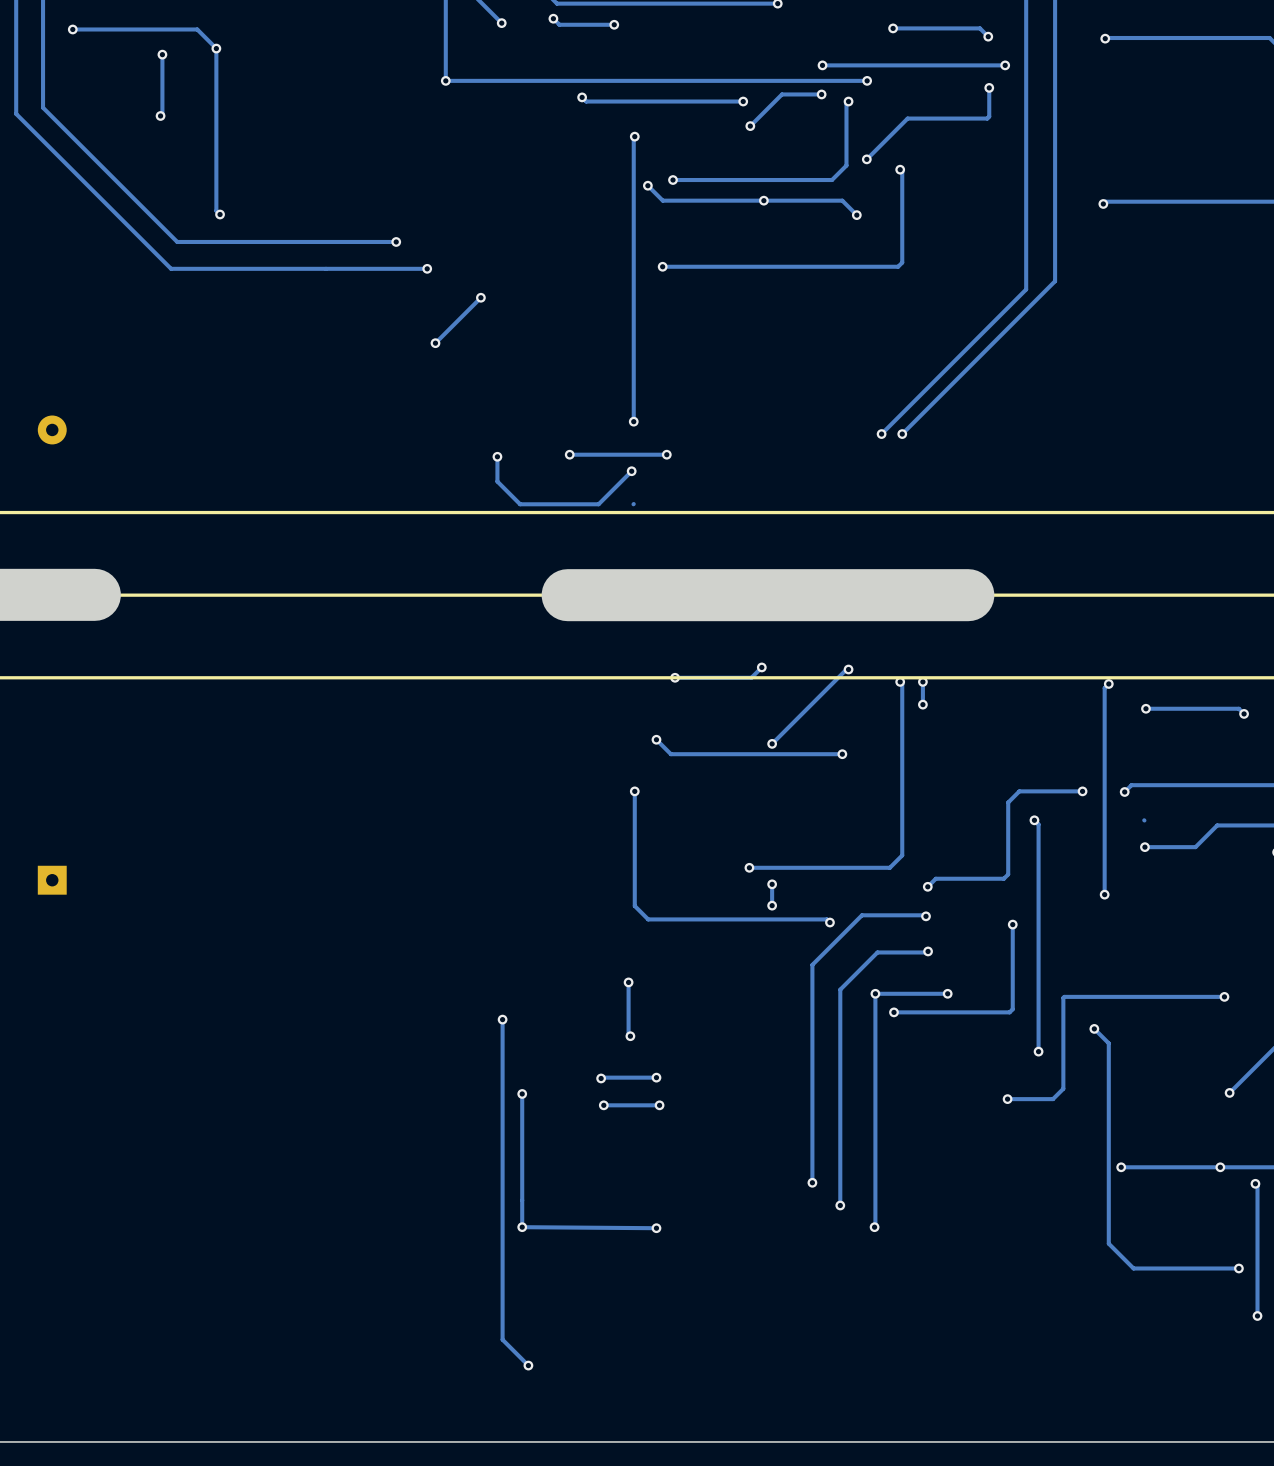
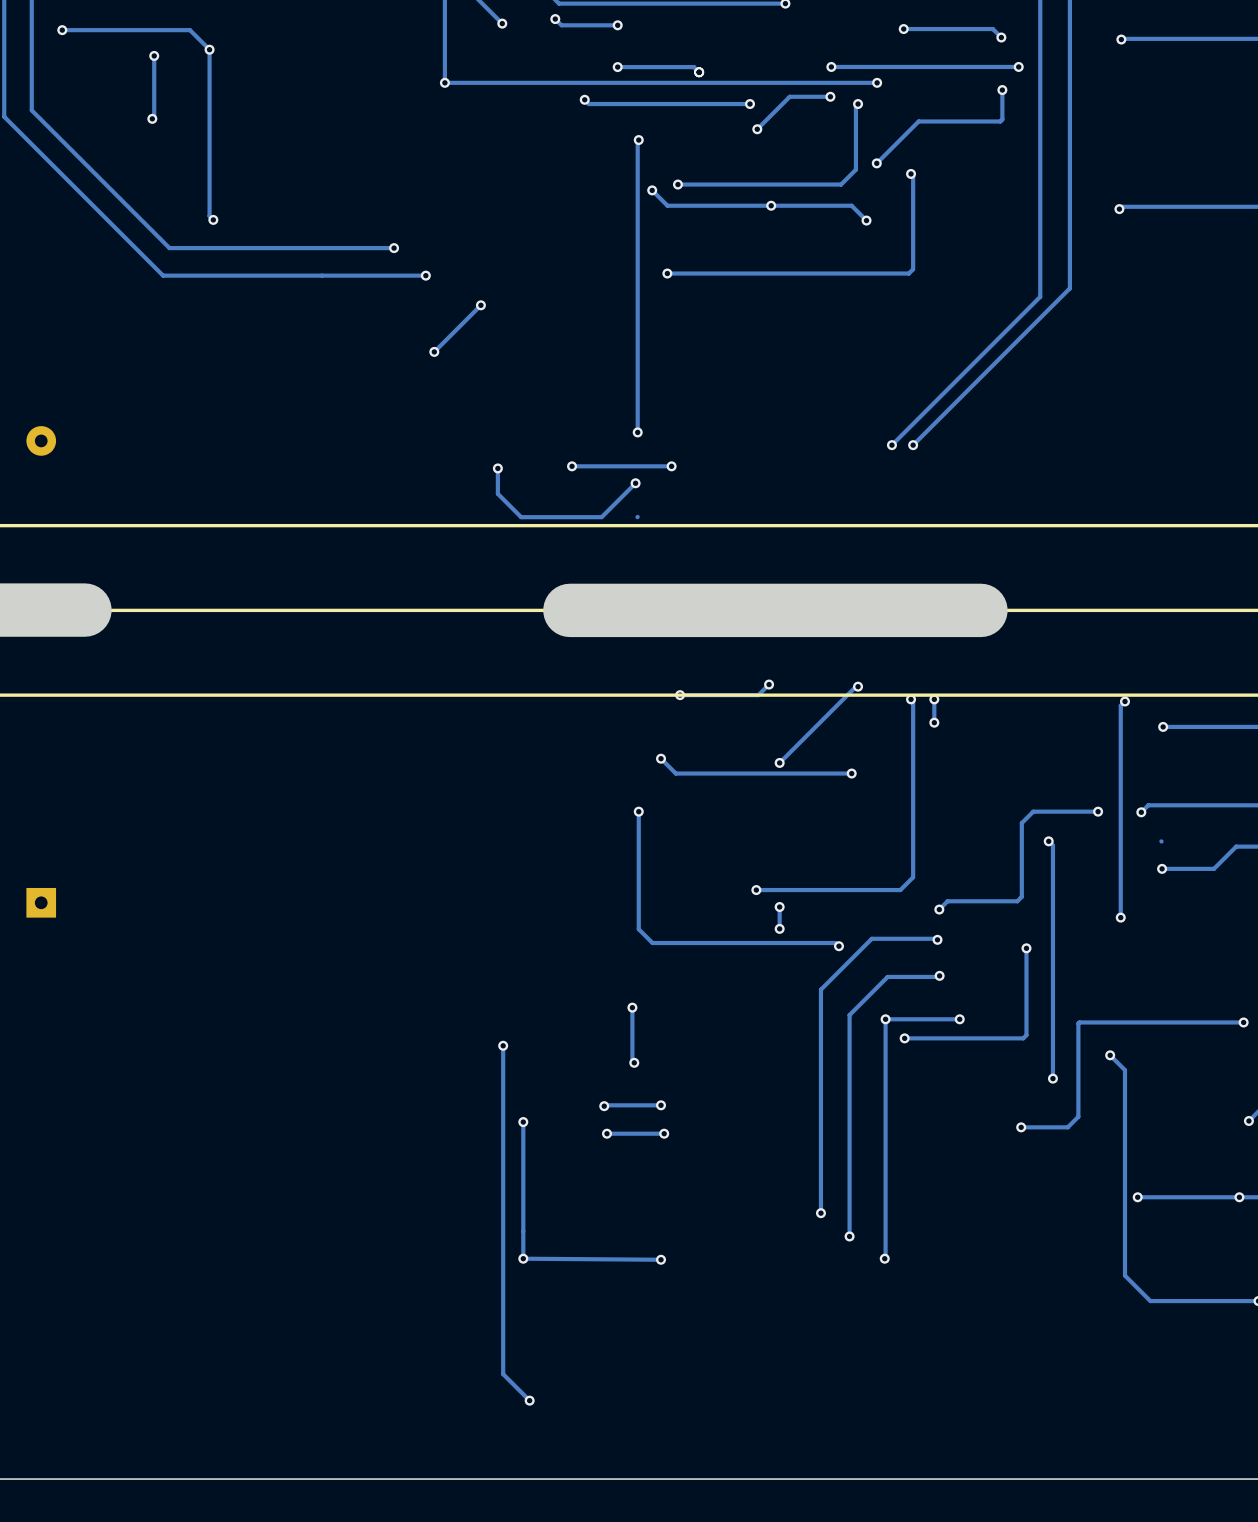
track: none -> (617, 67) (693, 67) (699, 72)
via: none -> (617, 67)
via: none -> (699, 72)

